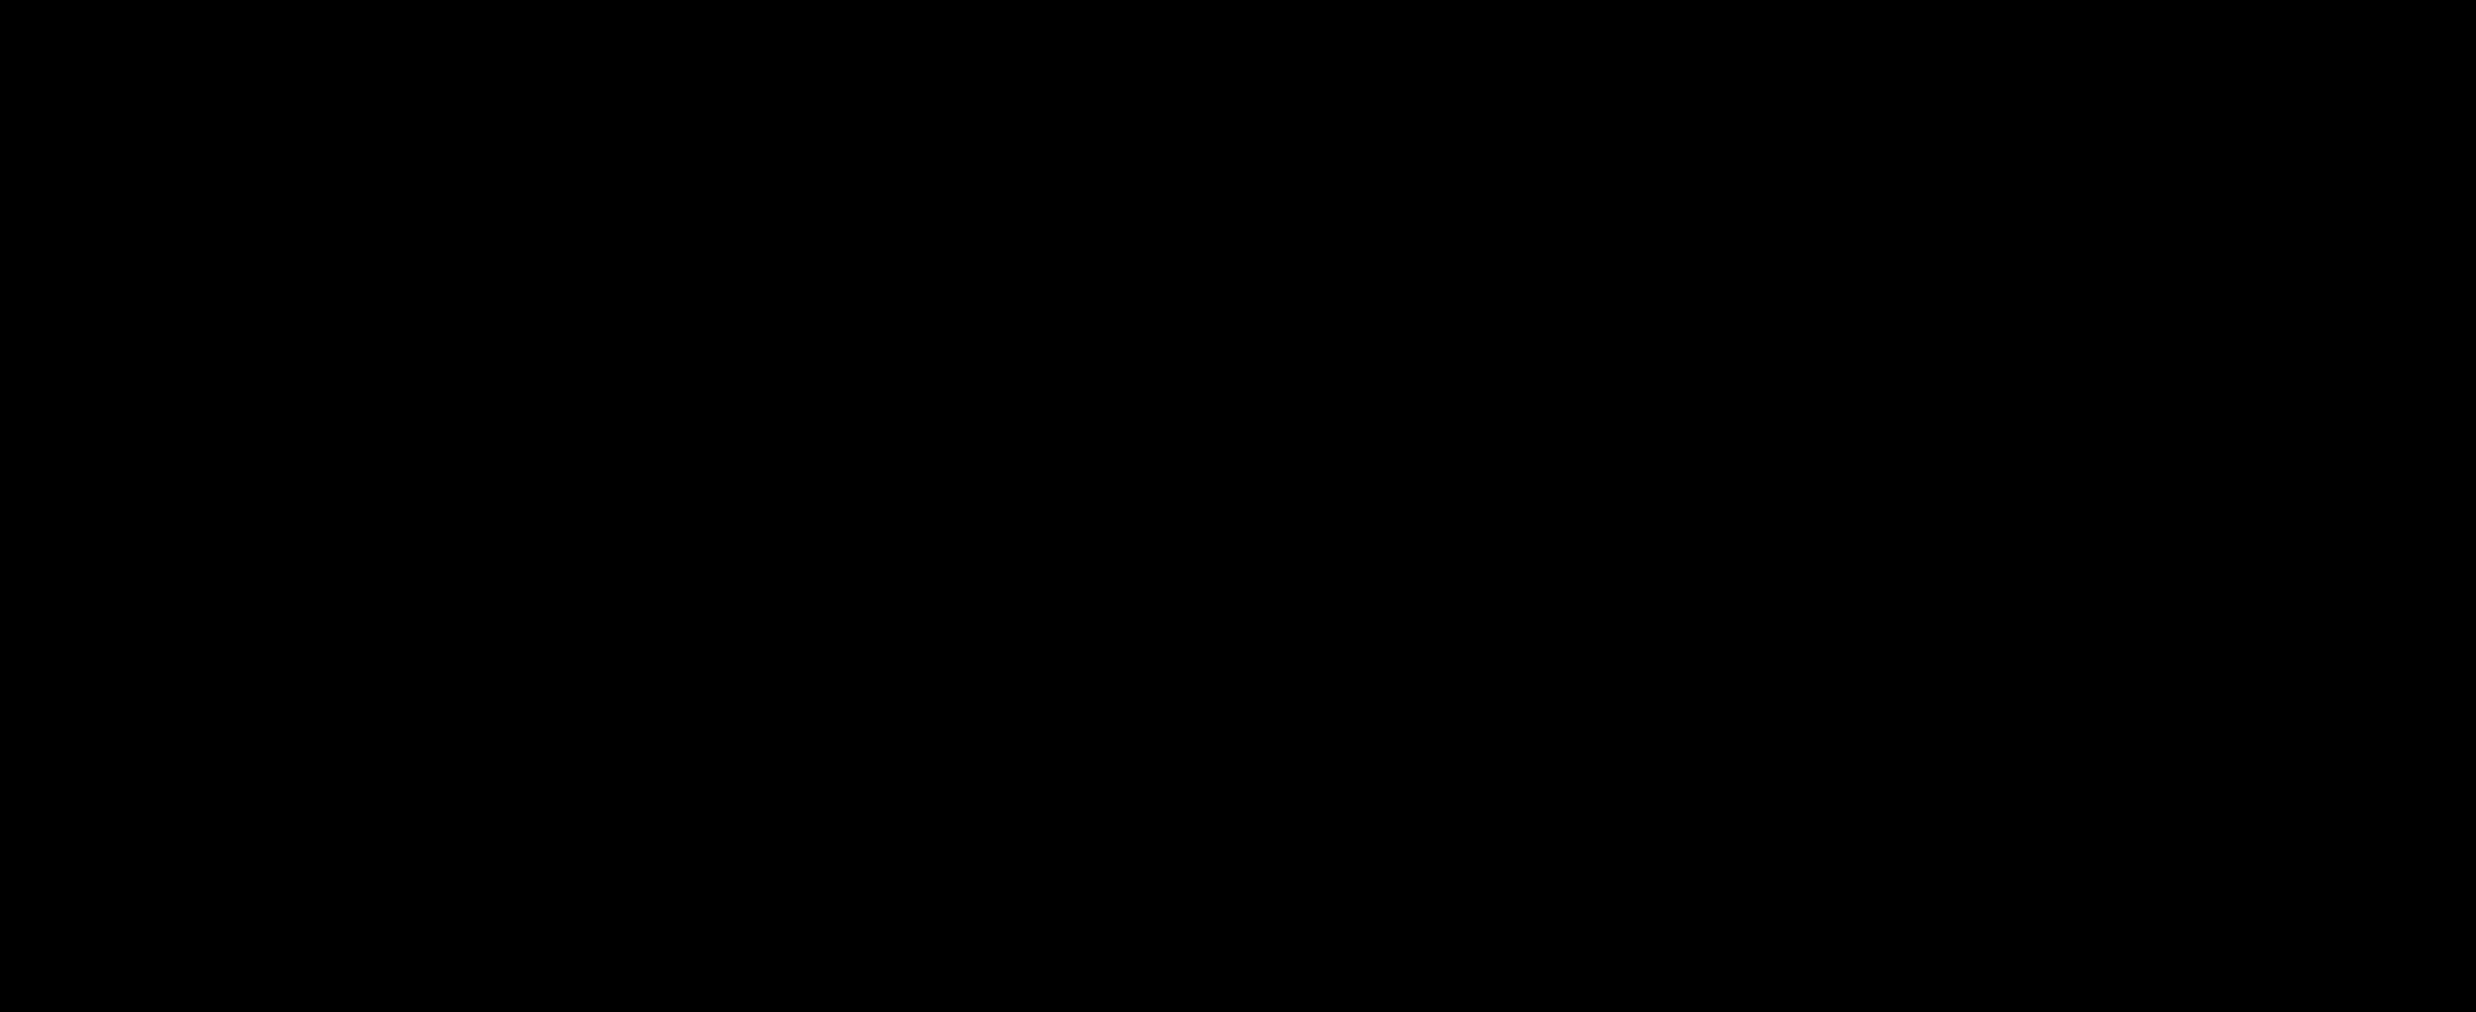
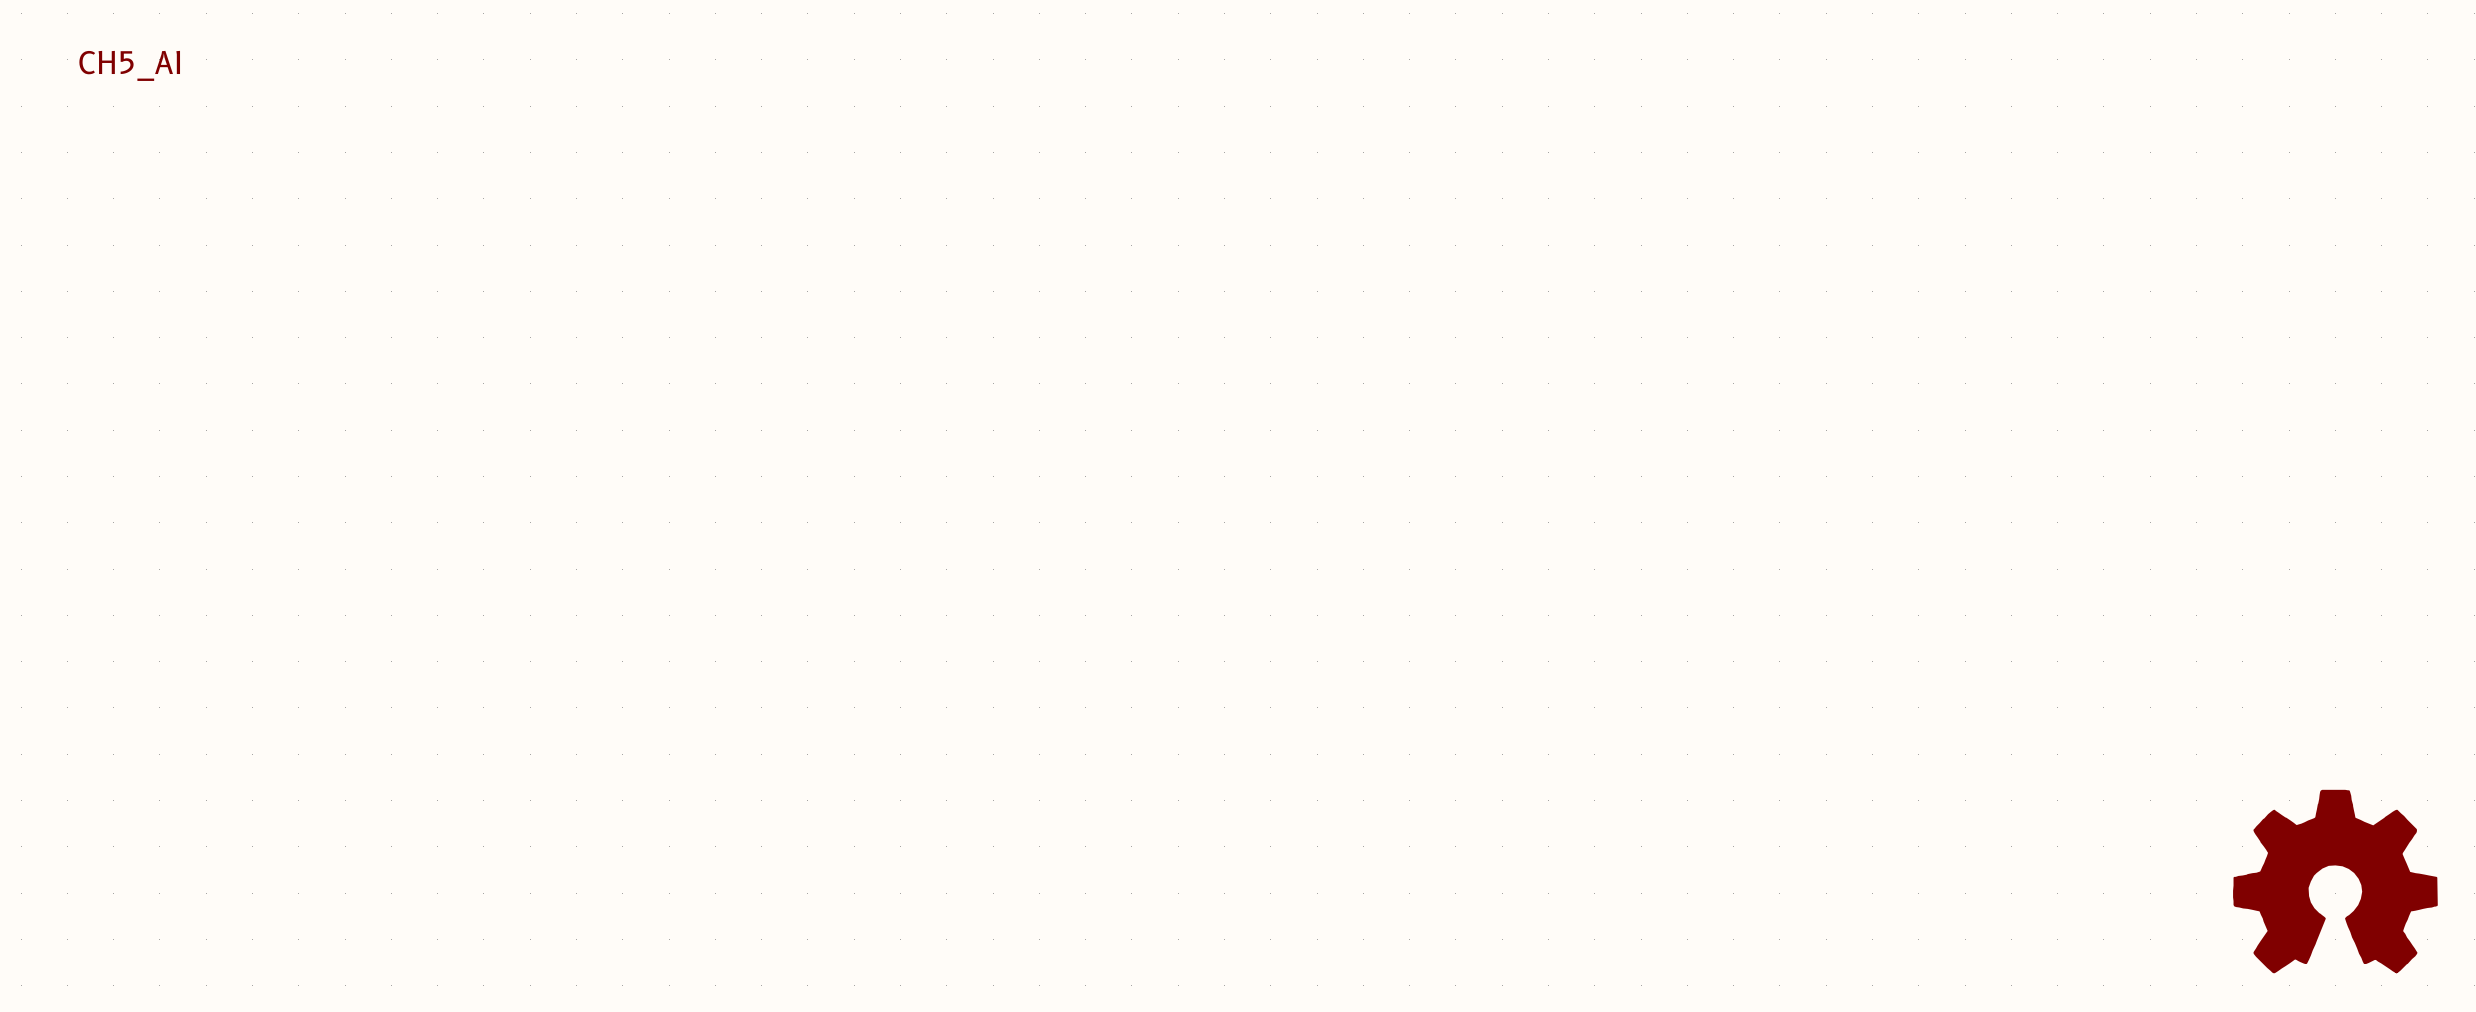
label: none -> CH5_AI (129, 65)
part: none -> (2335, 881)

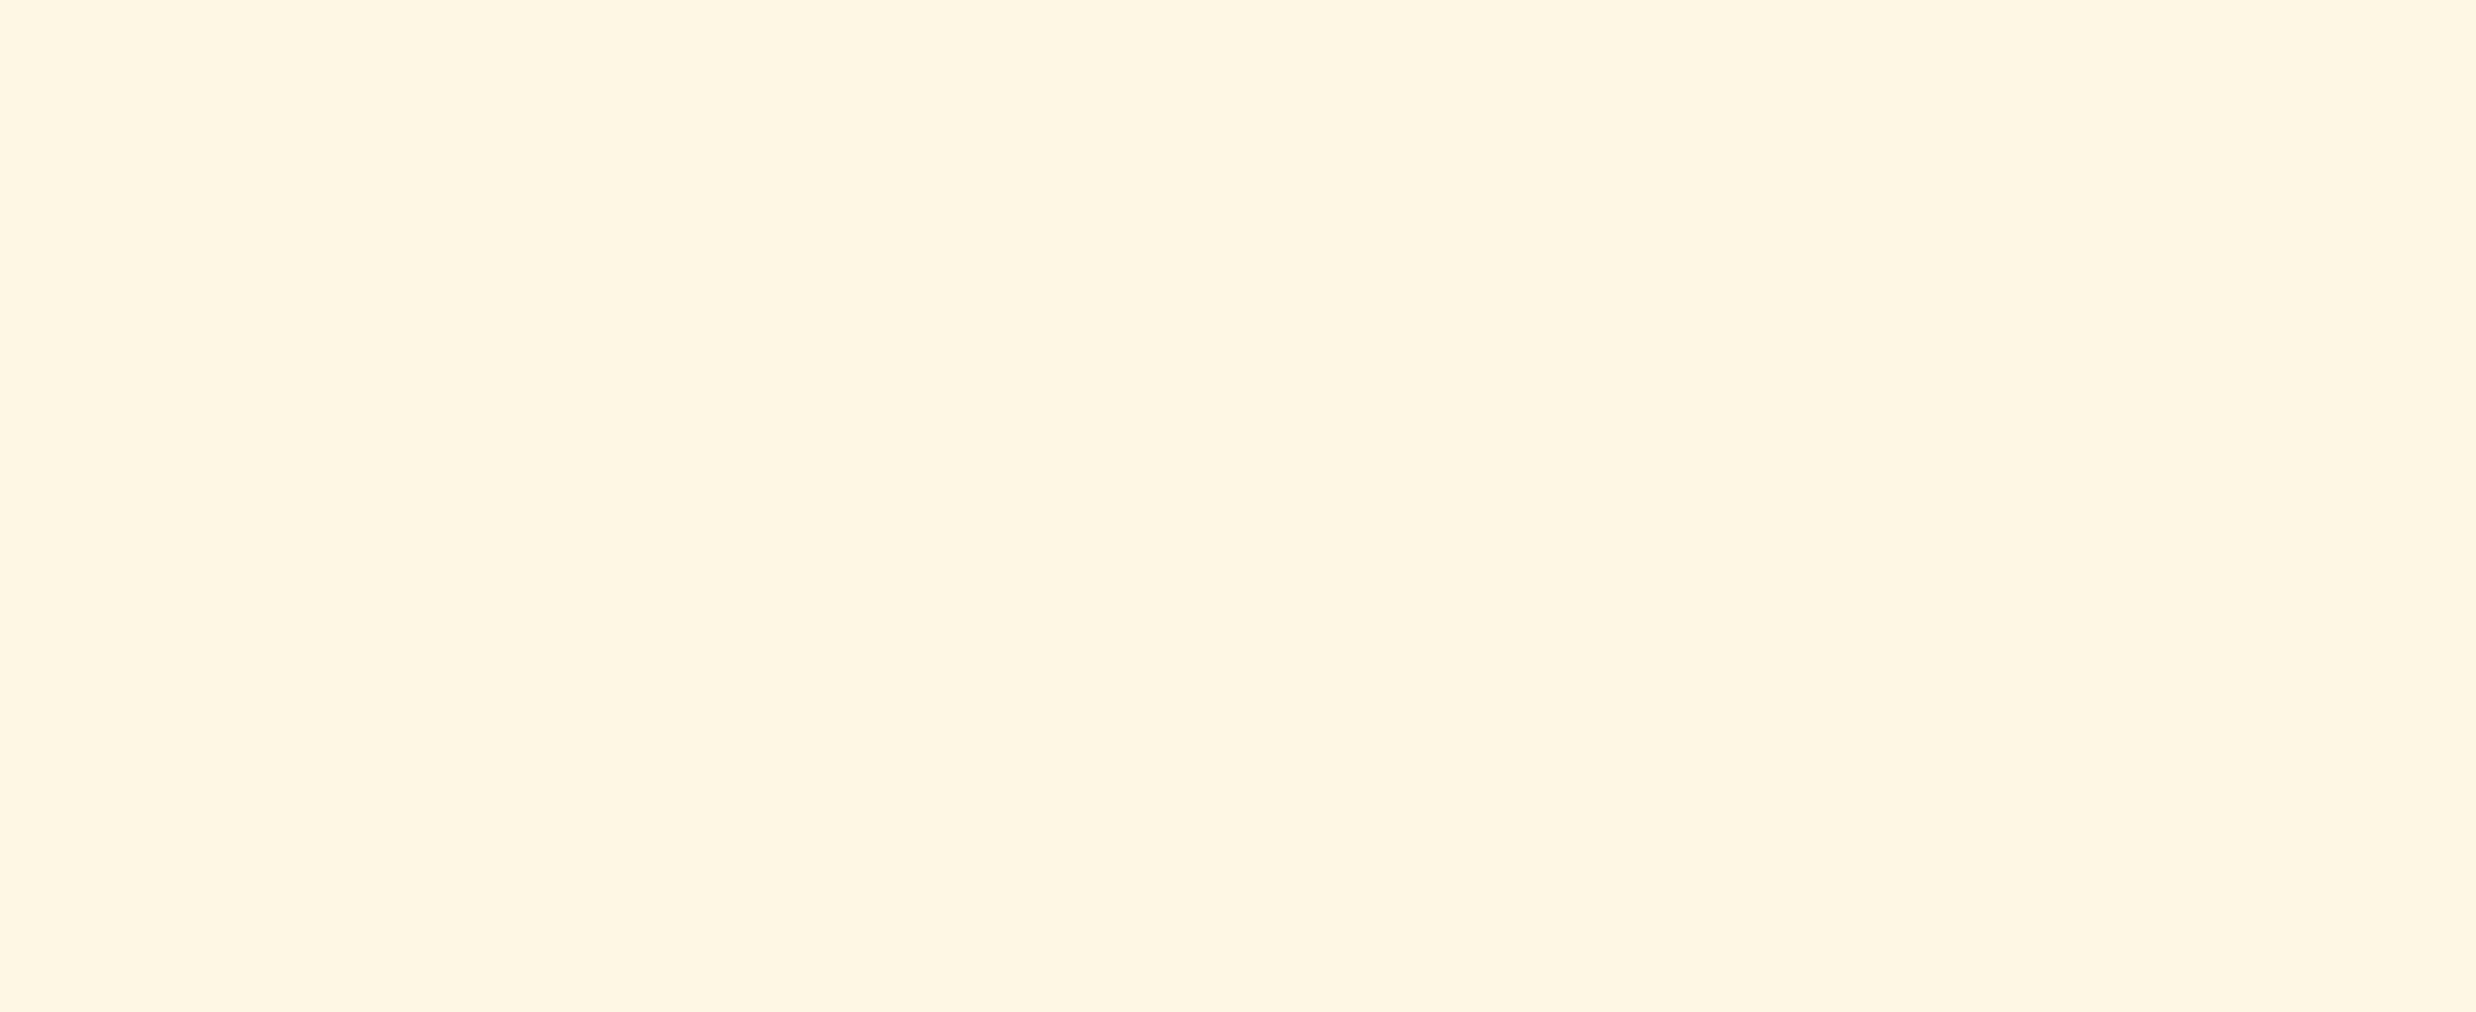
label: CH5_AI (129, 65) -> none
part: (2335, 881) -> none

